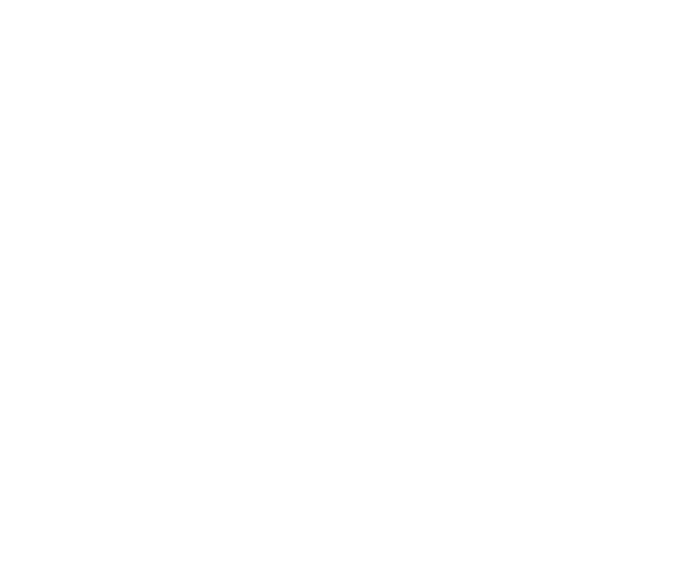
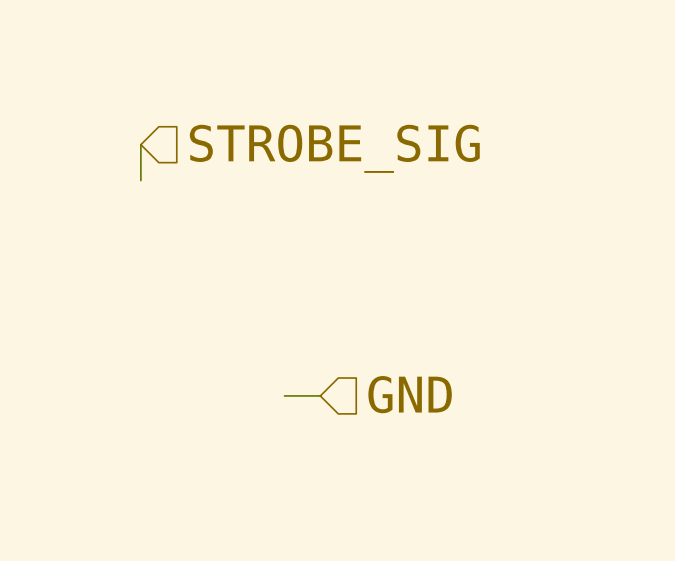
wire: none -> (140, 144) (140, 180)
hierarchical label: none -> STROBE_SIG (334, 148)
hierarchical label: none -> GND (410, 394)
wire: none -> (284, 395) (320, 395)

